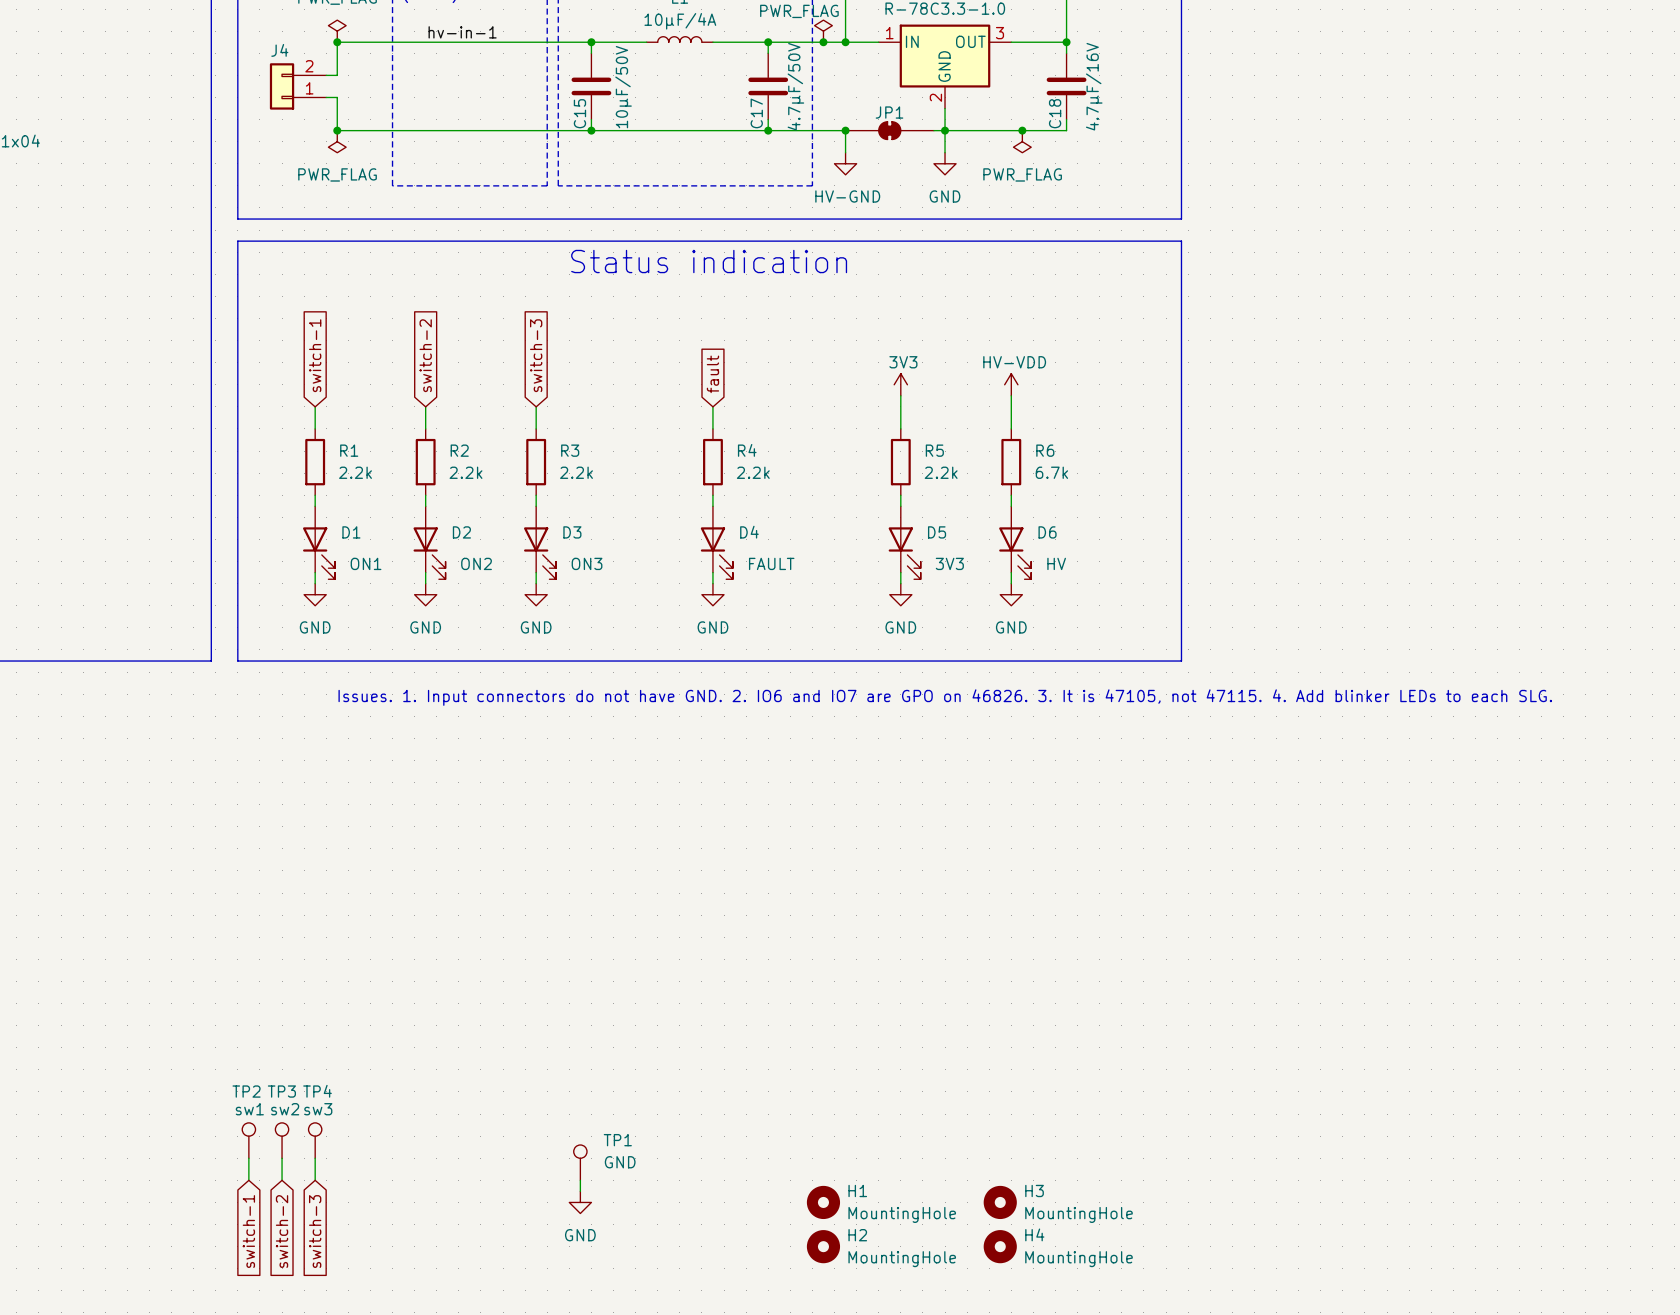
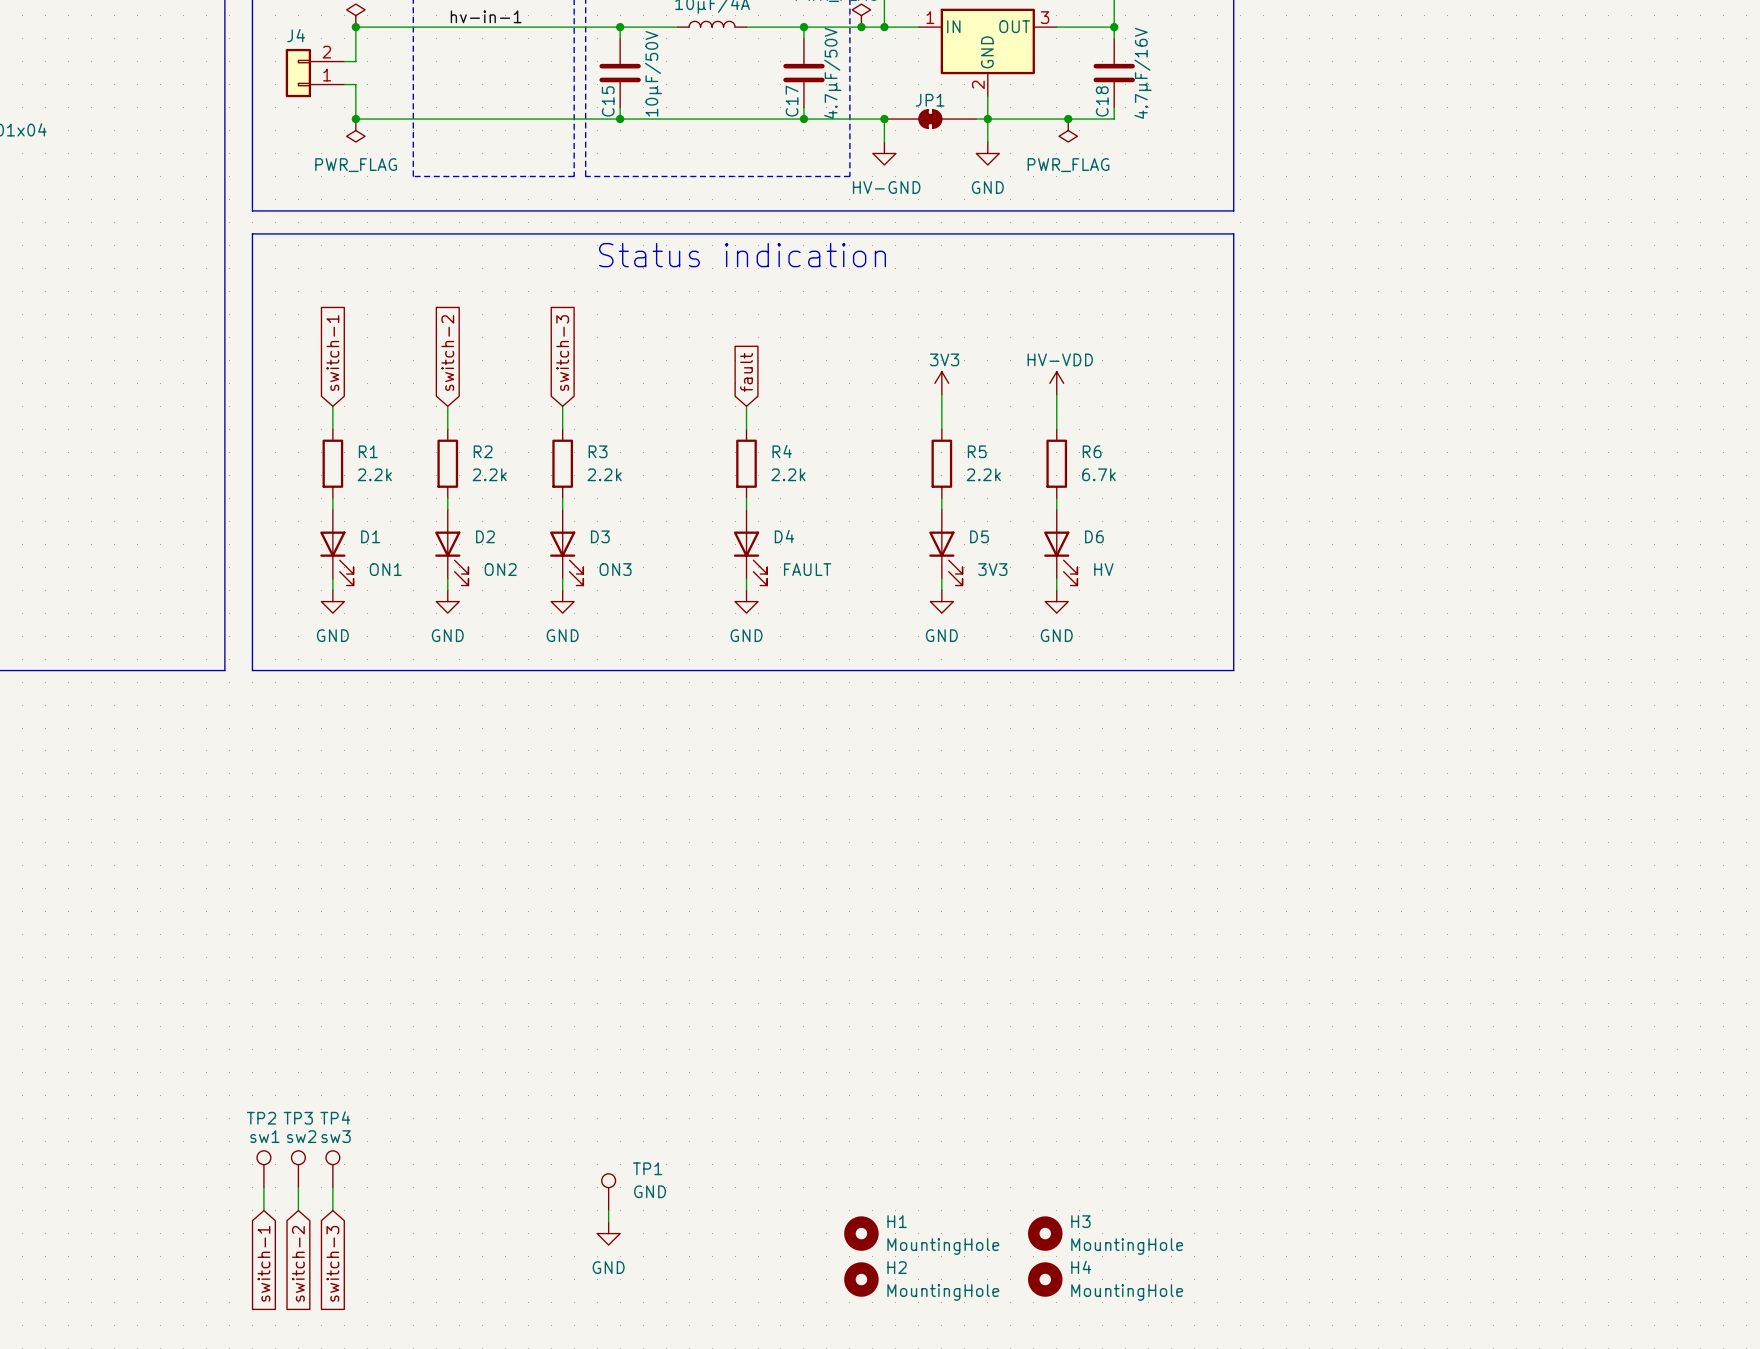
text: Issues. 1. Input connectors do not have GND. 2. IO6 and IO7 are GPO on 46826. 3. It is 47105, not 47115. 4. Add blinker LEDs to each SLG. (945, 697) -> none

